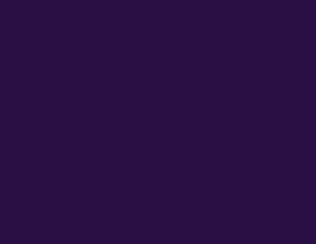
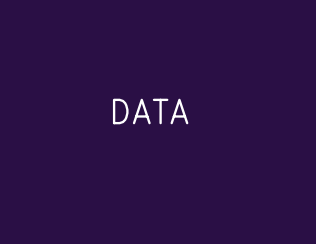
text: none -> DATA (150, 111)

